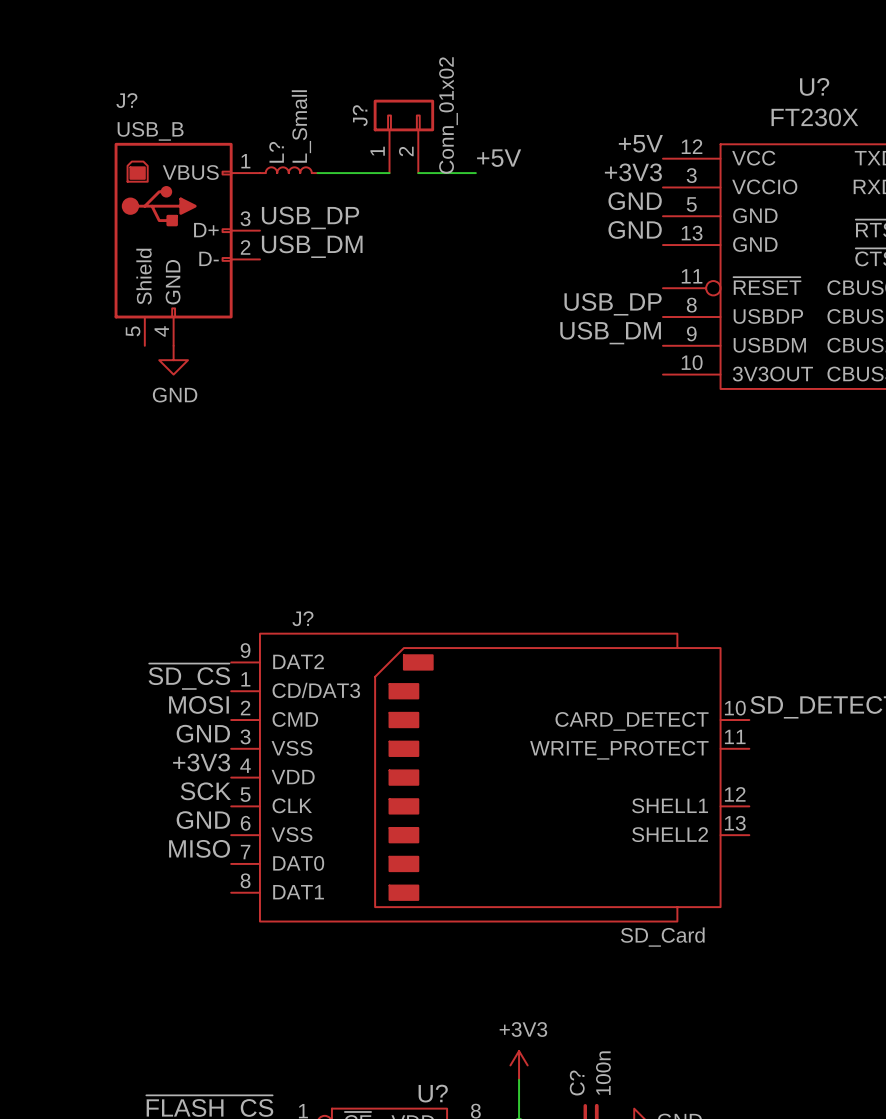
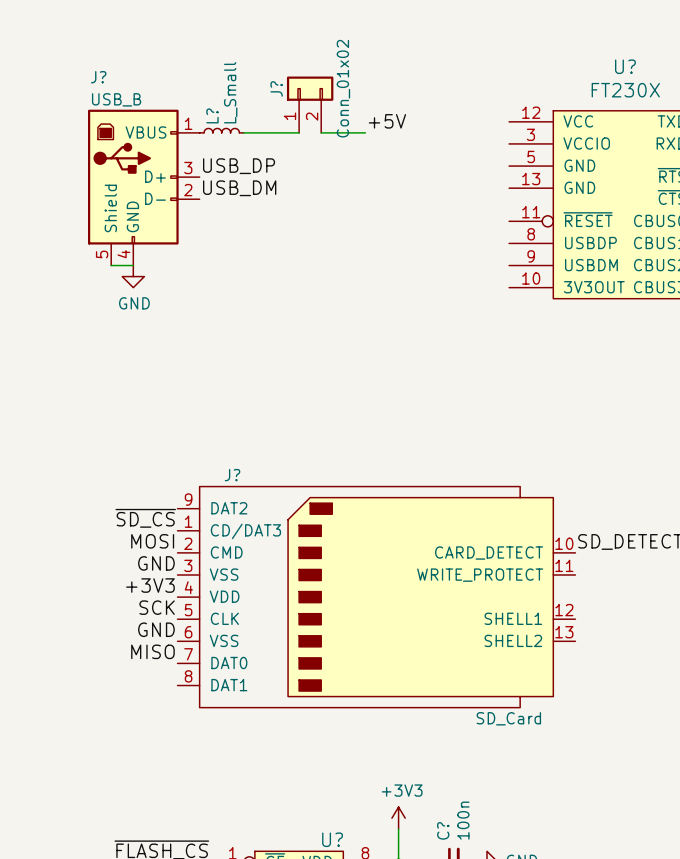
label: +5V (640, 143) -> none
label: +3V3 (633, 172) -> none
label: GND (635, 201) -> none
label: GND (635, 229) -> none
label: USB_DP (613, 304) -> none
label: USB_DM (610, 333) -> none
wire: none -> (111, 265) (133, 265)

